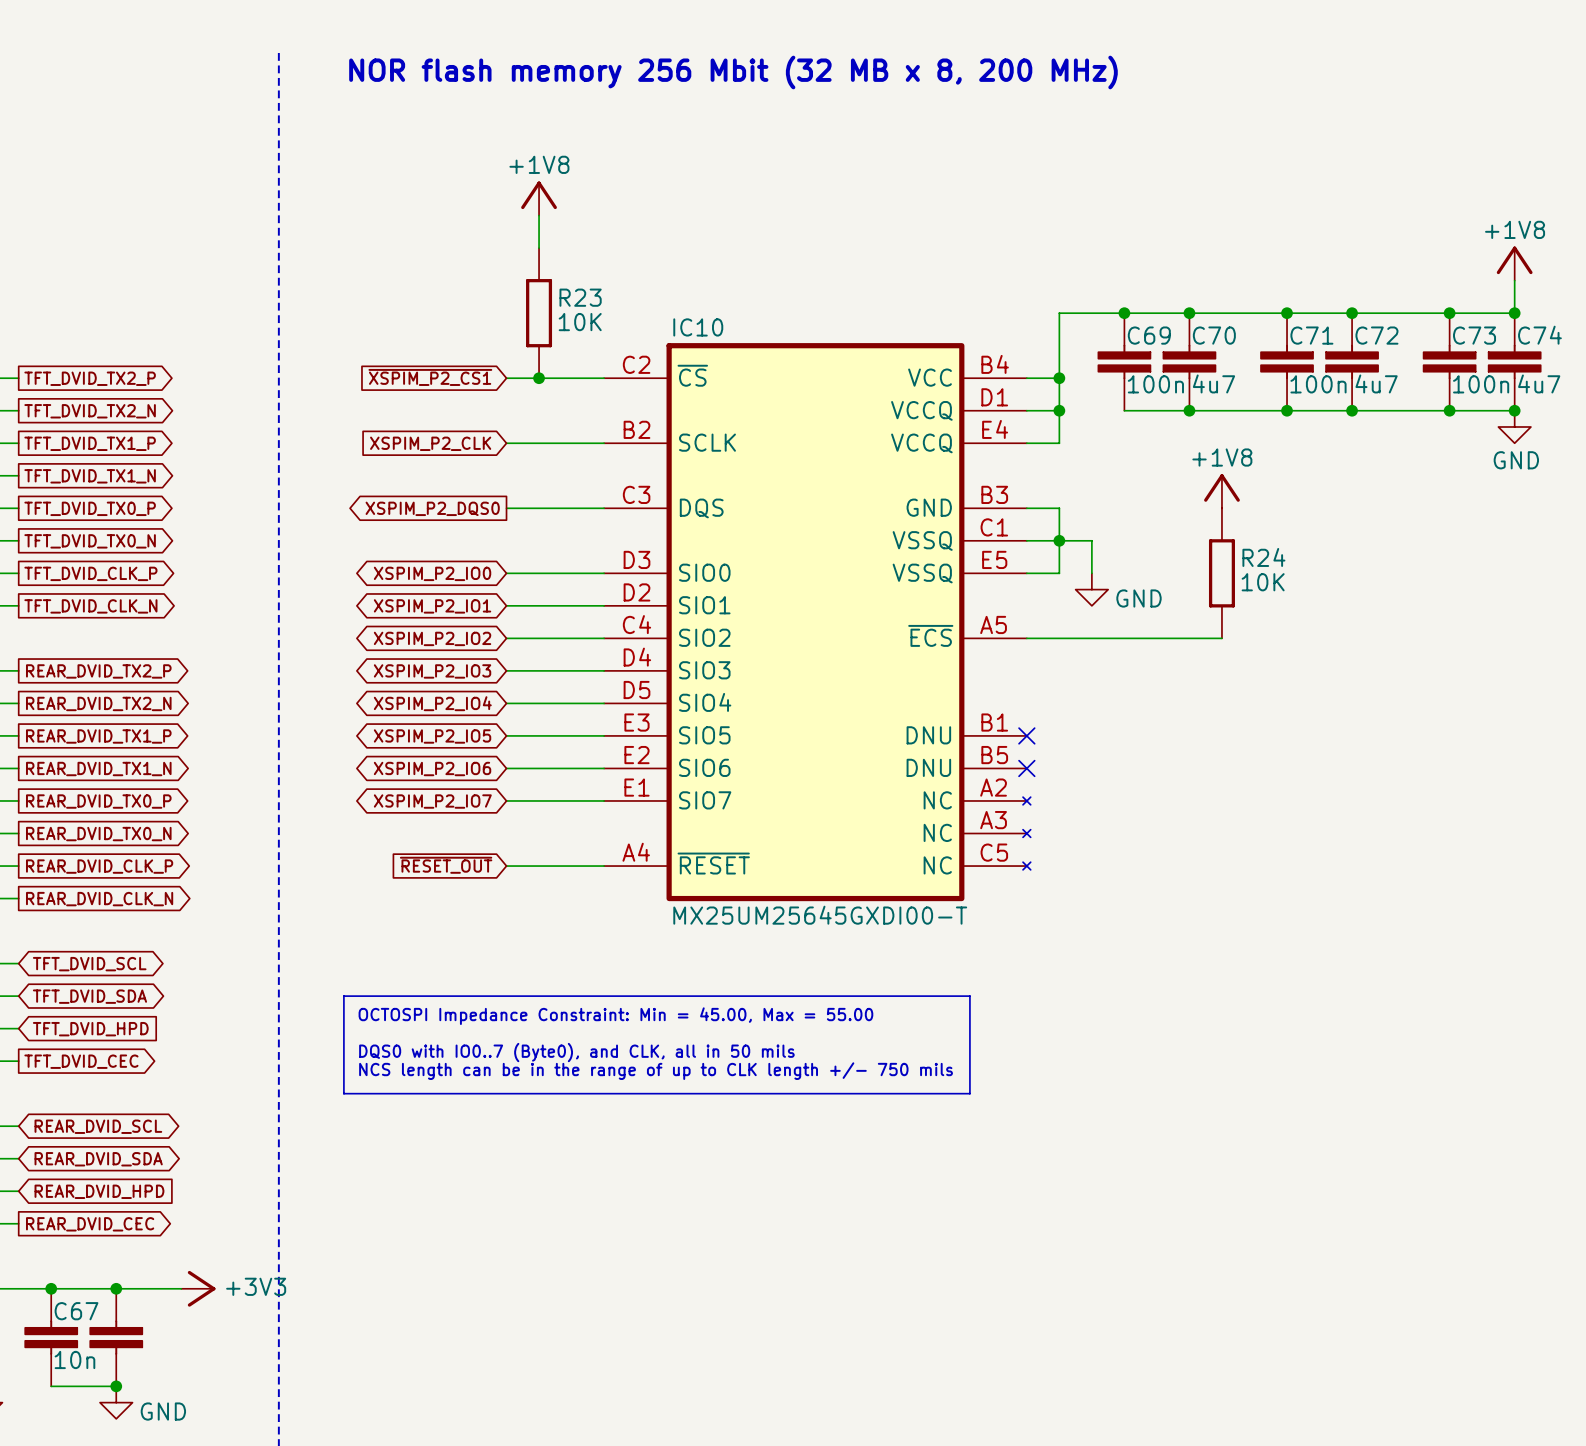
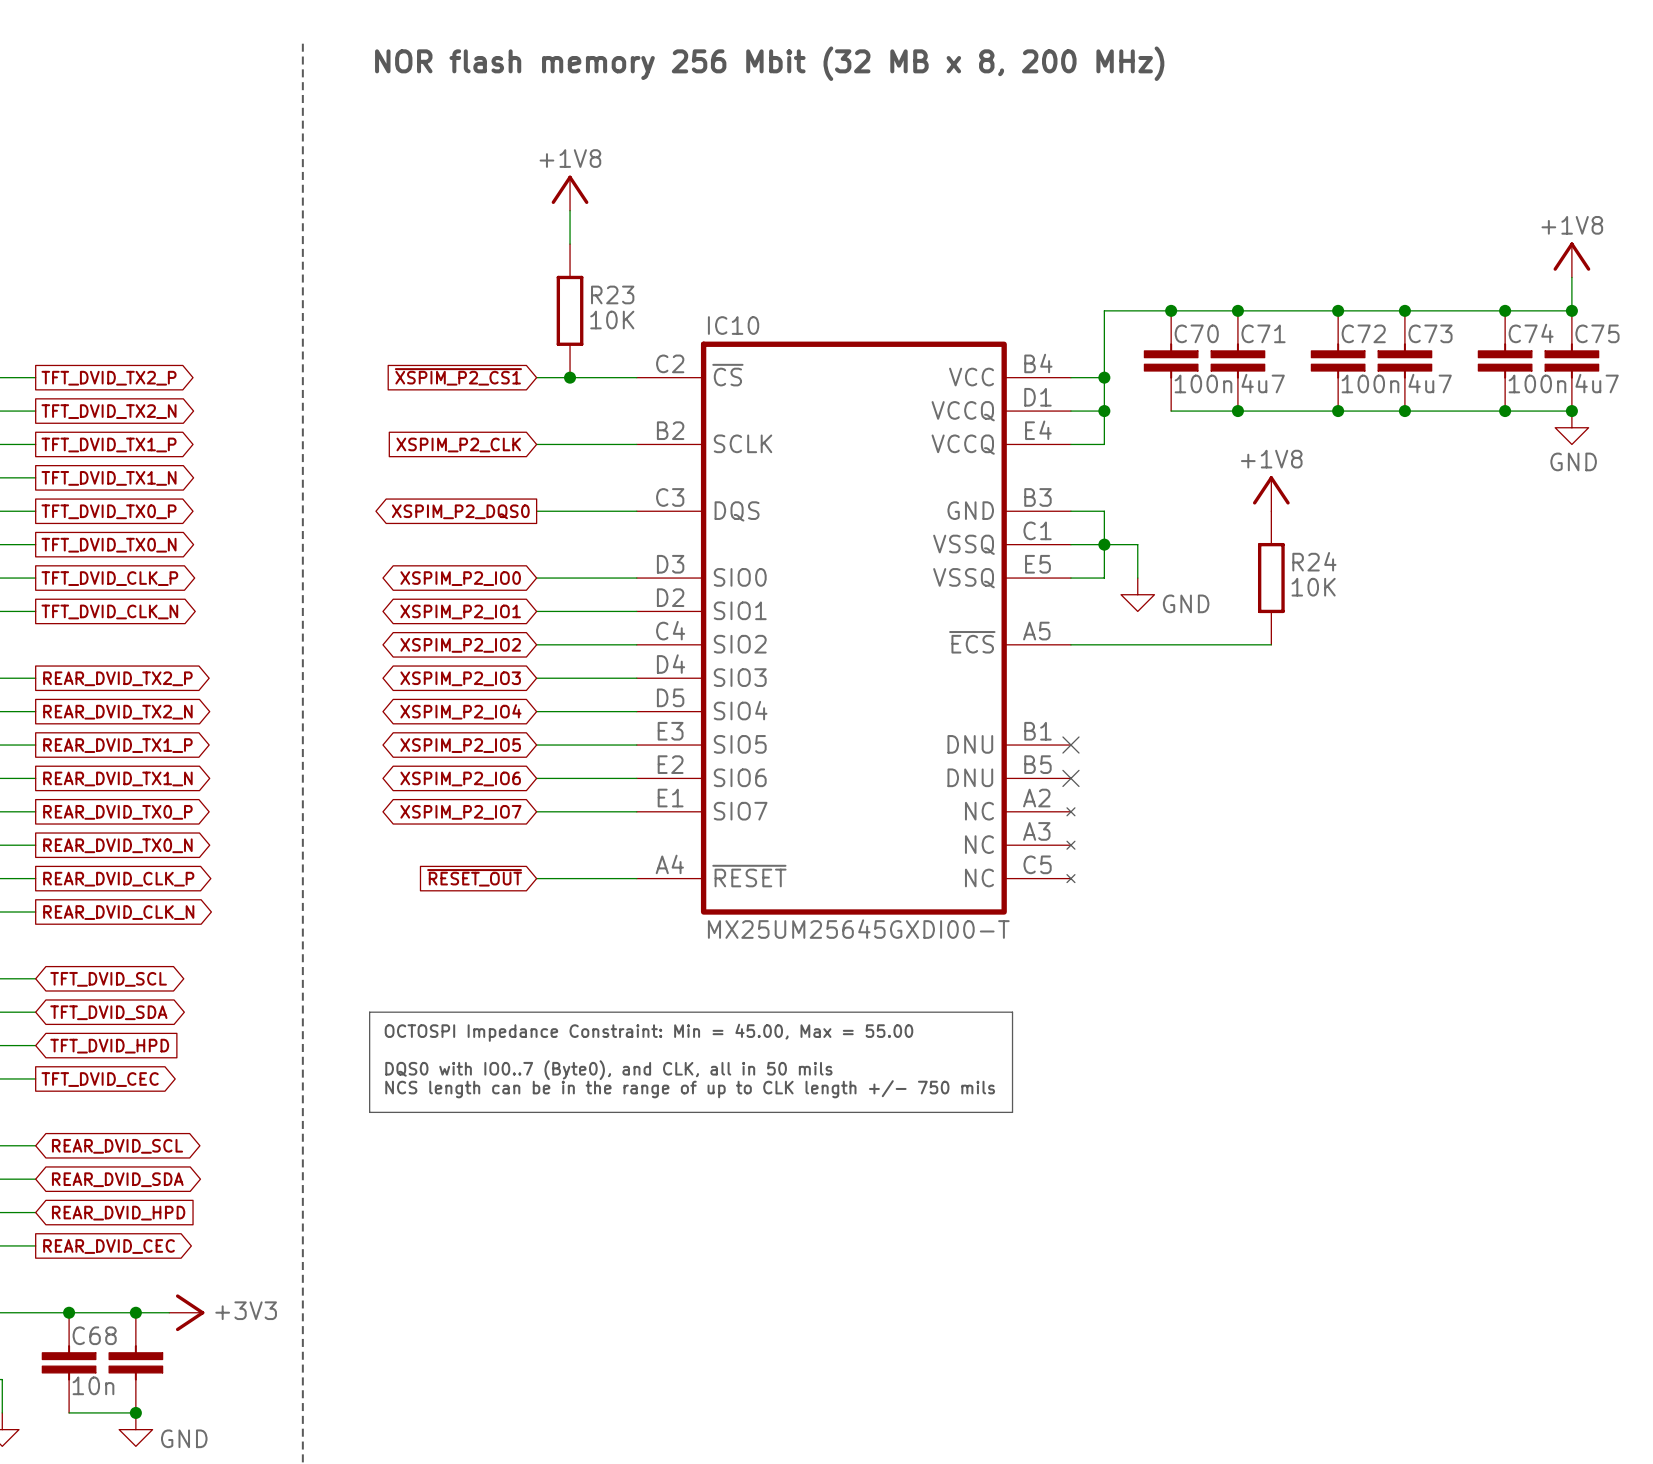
C69 name: C69 (1149, 335) -> C70 (1196, 333)
C70 name: C70 (1214, 335) -> C71 (1263, 333)
C71 name: C71 (1311, 335) -> C72 (1363, 333)
C72 name: C72 (1376, 335) -> C73 (1430, 333)
C73 name: C73 (1474, 335) -> C74 (1531, 333)
C74 name: C74 (1539, 335) -> C75 (1597, 333)
power symbol position: +3V3 (198, 1288) -> +3V3 (186, 1312)
C67 name: C67 (76, 1311) -> C68 (94, 1335)

